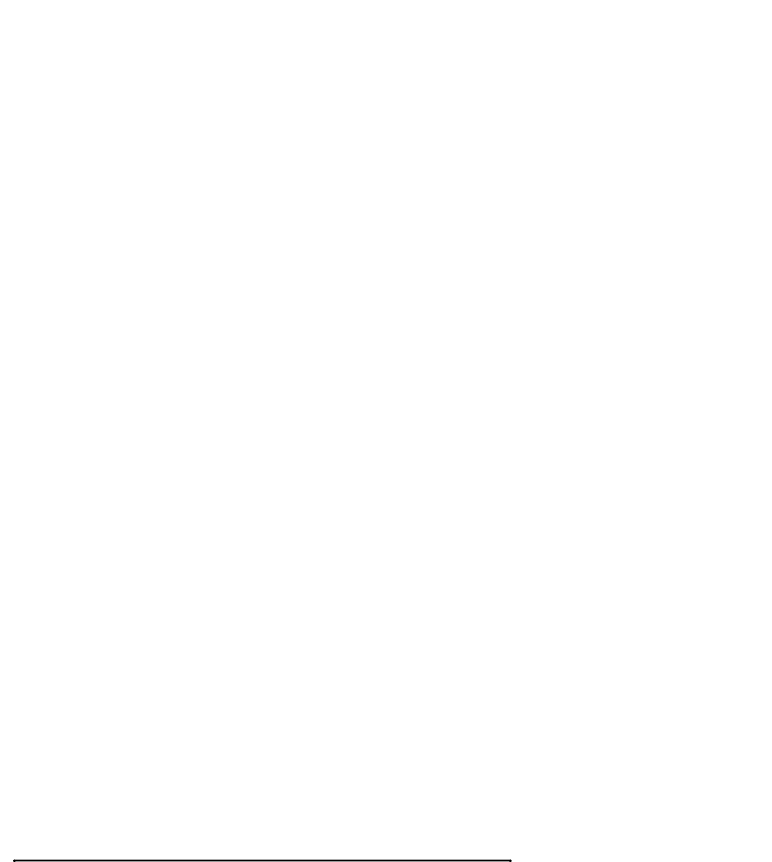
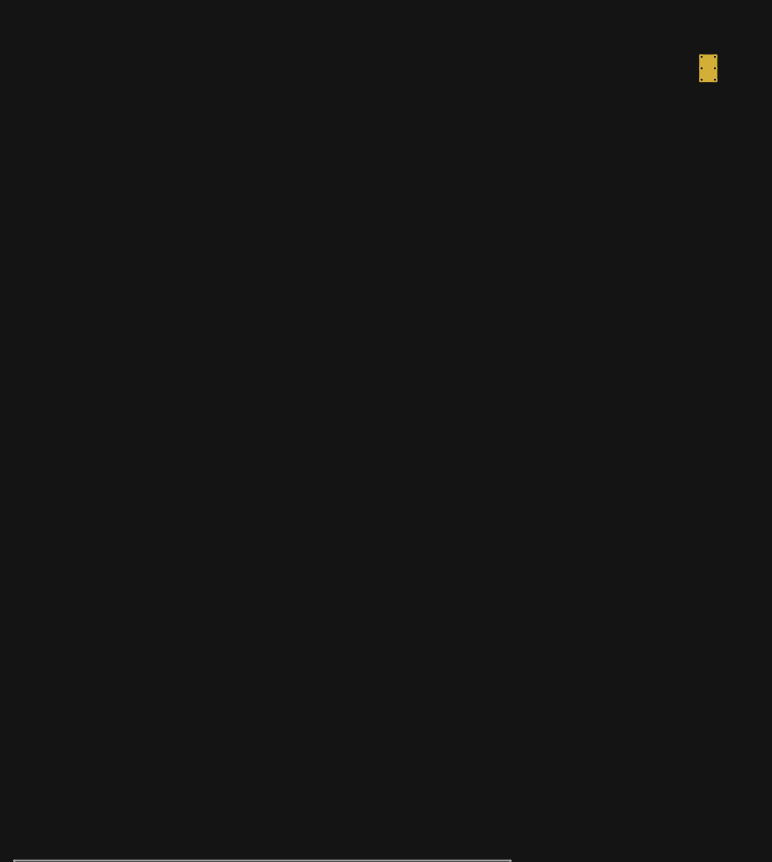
part: none -> (708, 68)

